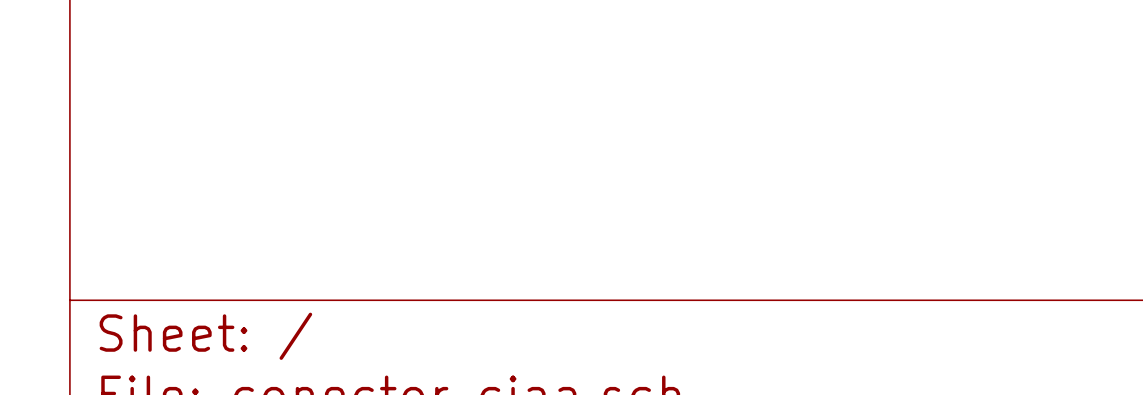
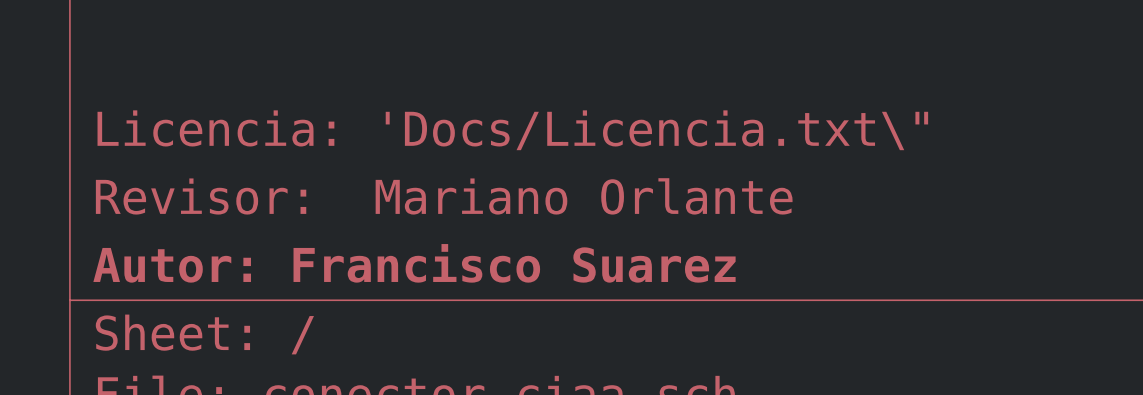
title block: none -> Licencia: 'Docs/Licencia.txt\" (512, 130)
title block: none -> Revisor: Mariano Orlante (444, 196)
title block: none -> Autor: Francisco Suarez (414, 263)

